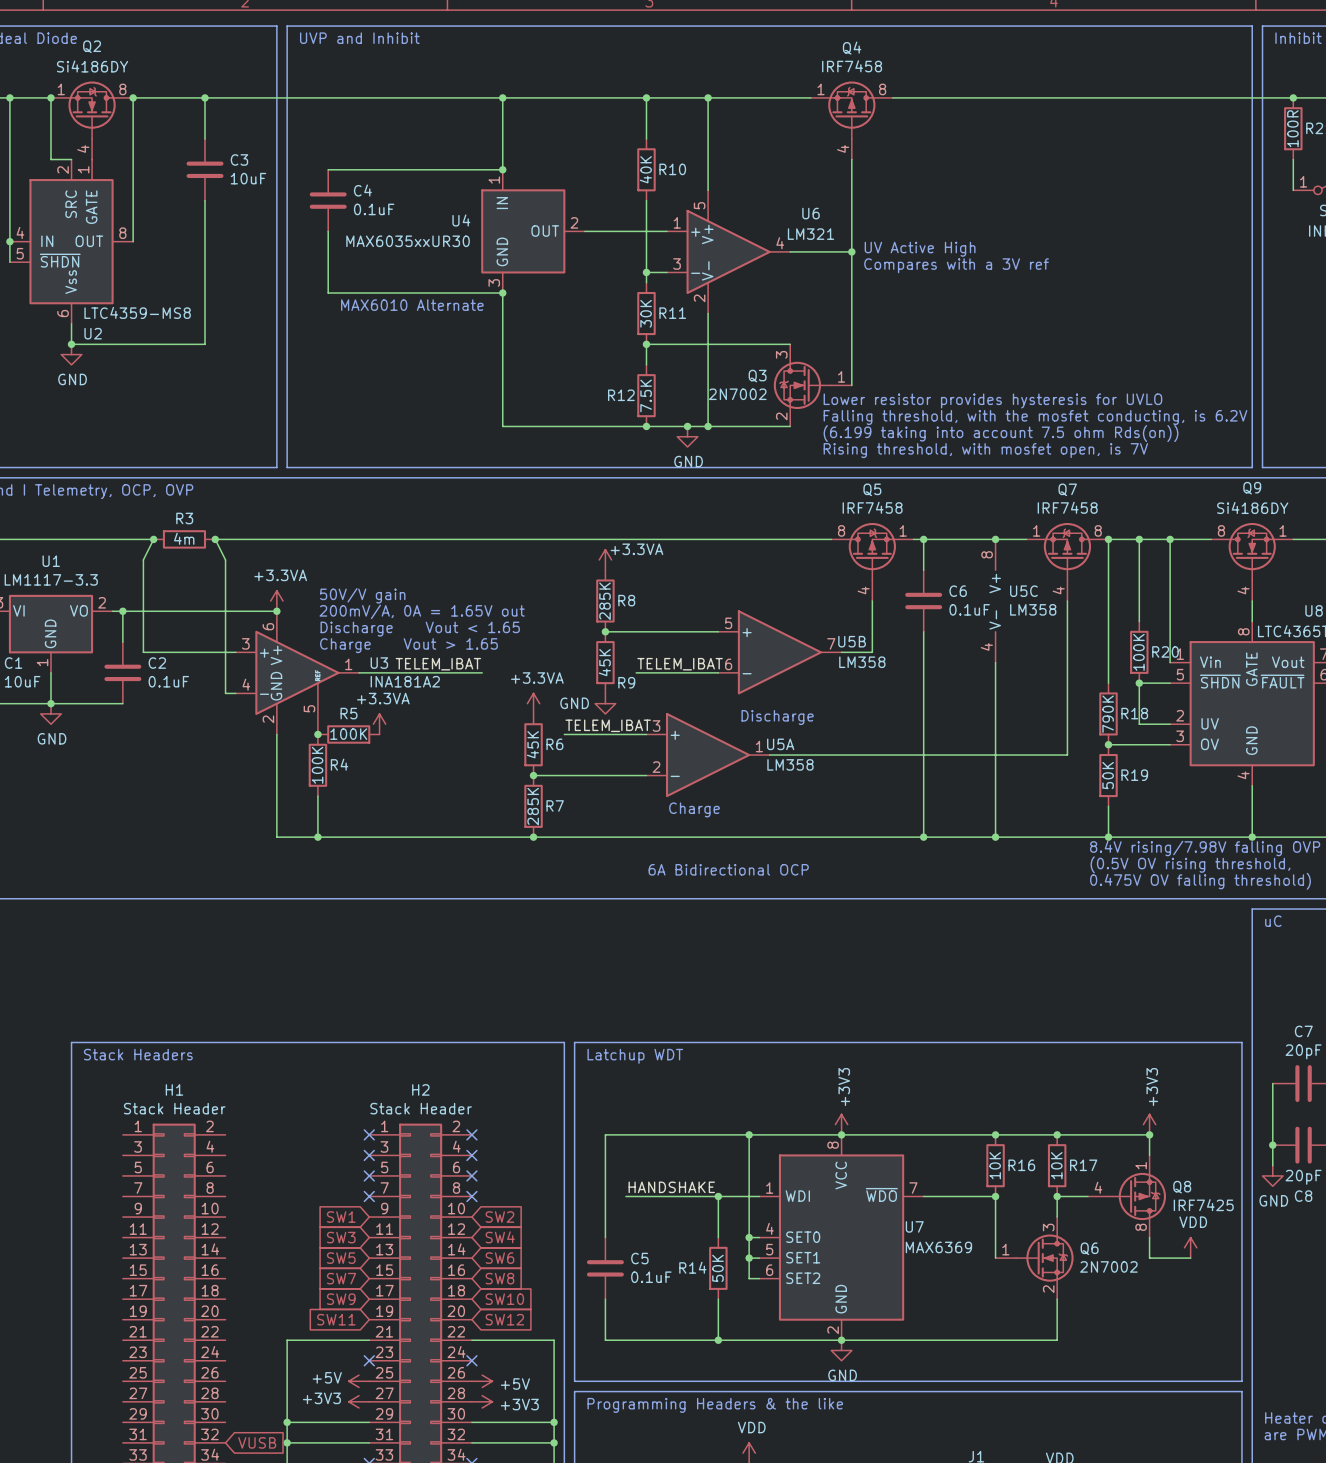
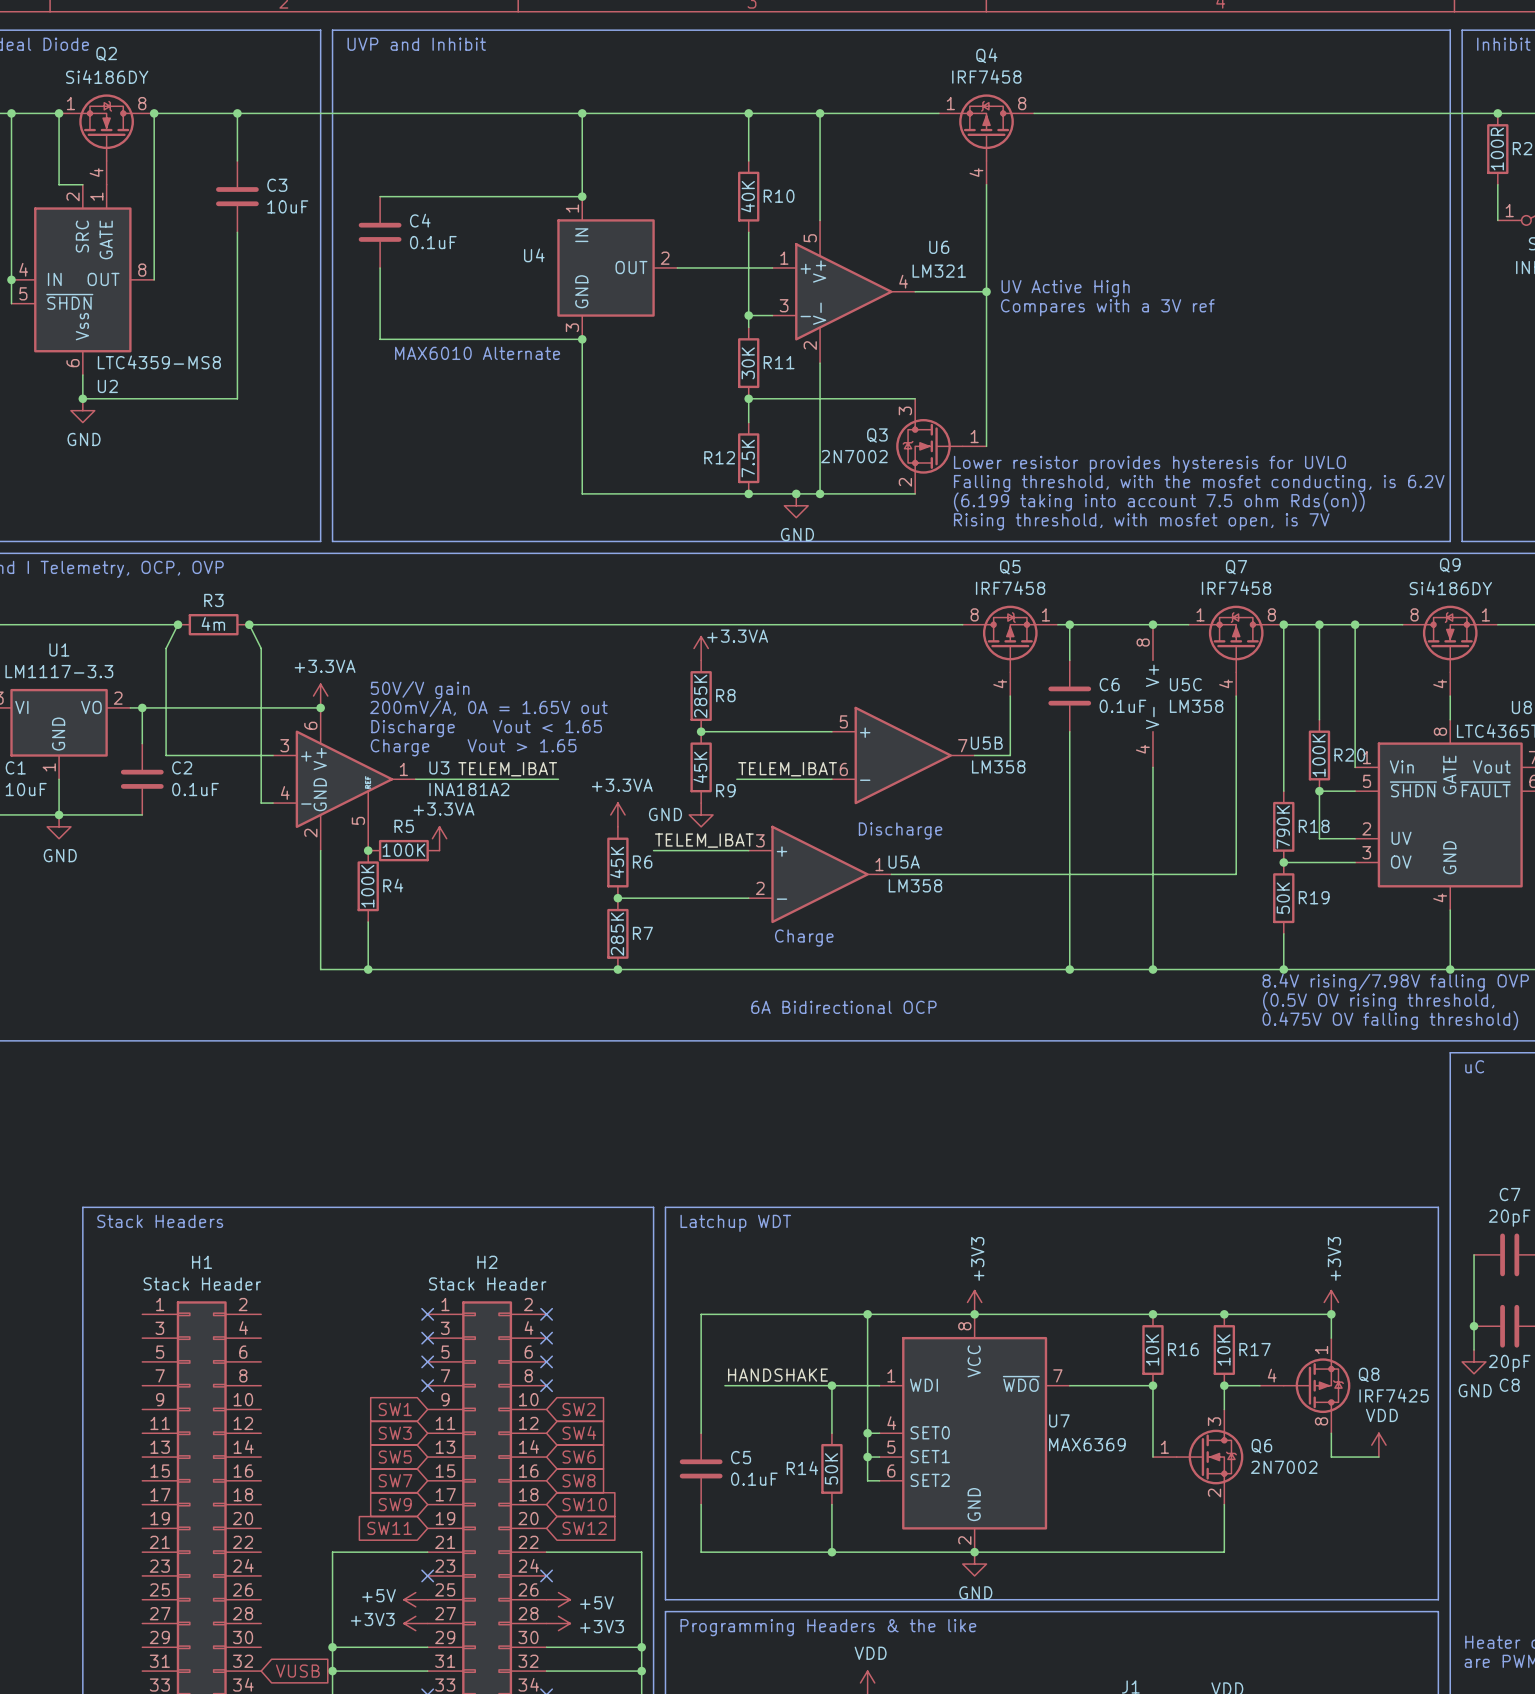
U4 value: MAX6035xxUR30 (408, 241) -> none

